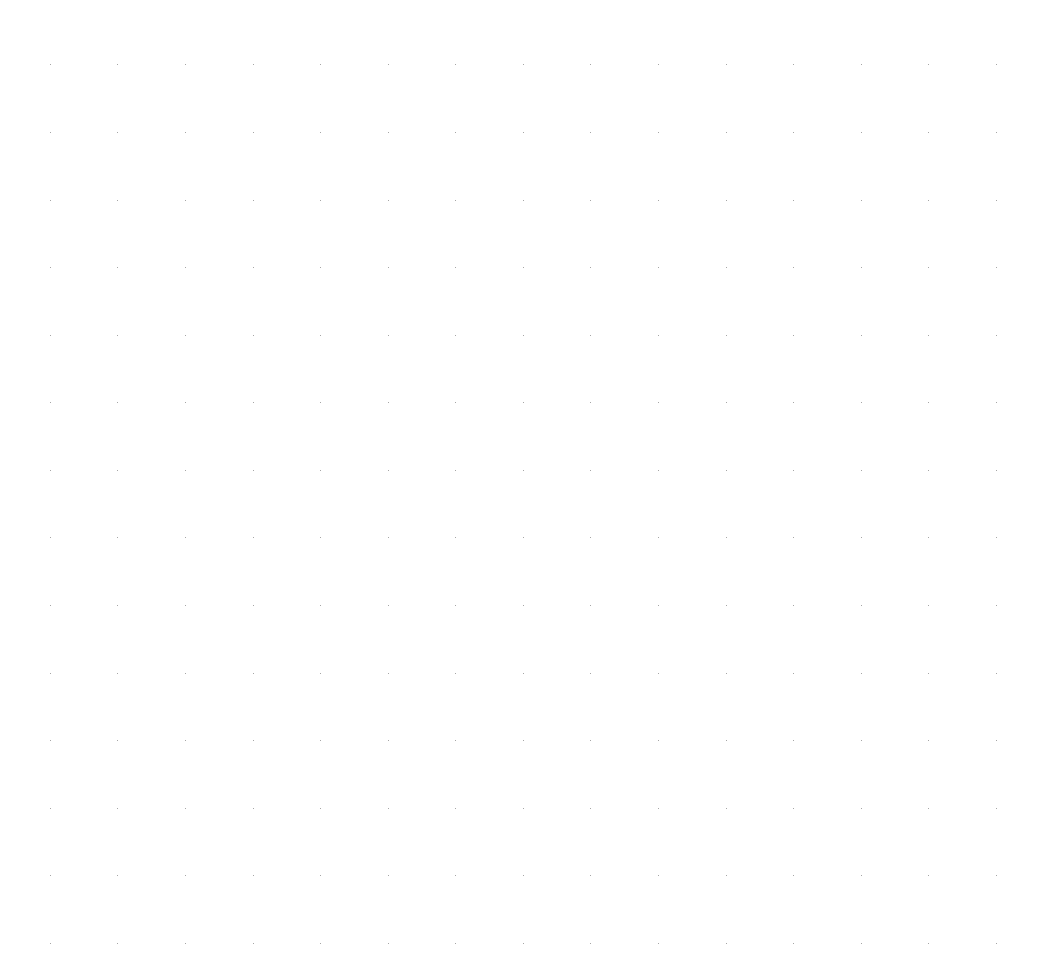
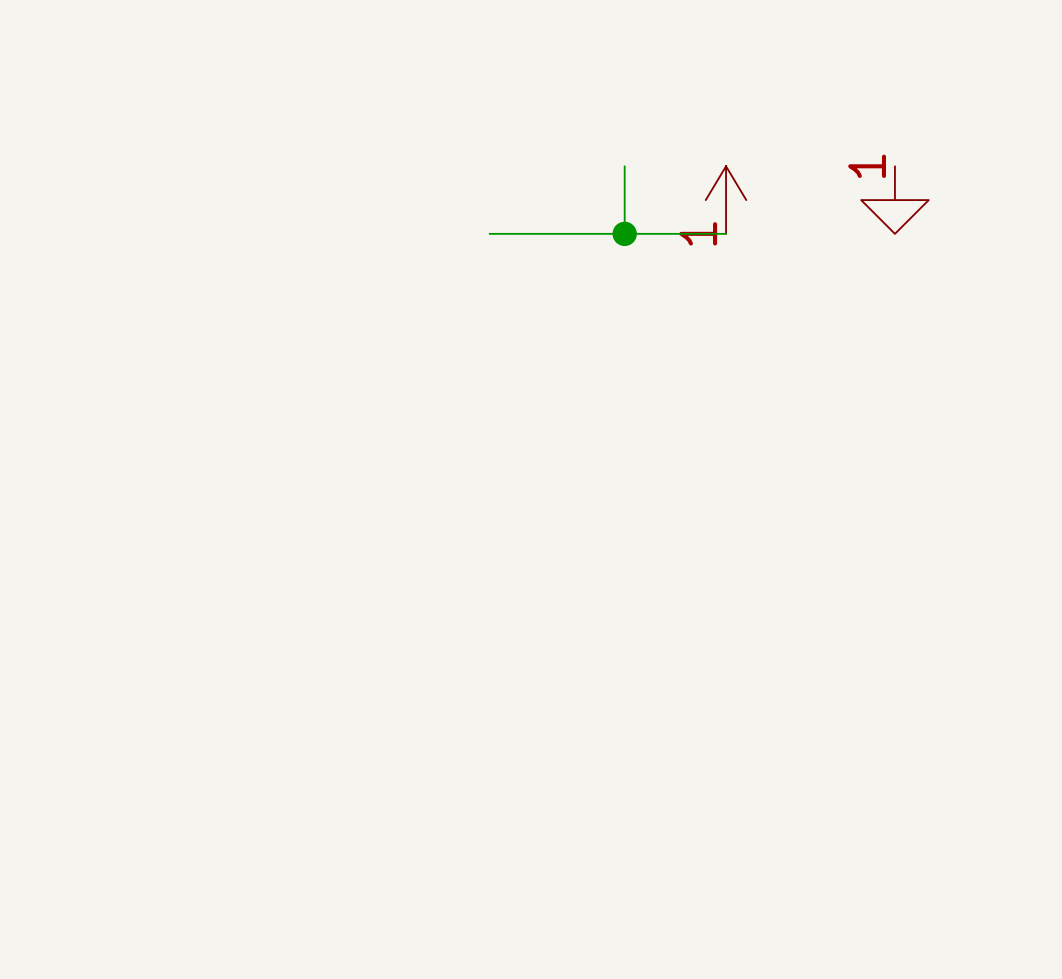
wire: none -> (624, 166) (624, 233)
power symbol: none -> (726, 200)
power symbol: none -> (894, 200)
wire: none -> (489, 233) (726, 233)
junction: none -> (624, 233)

